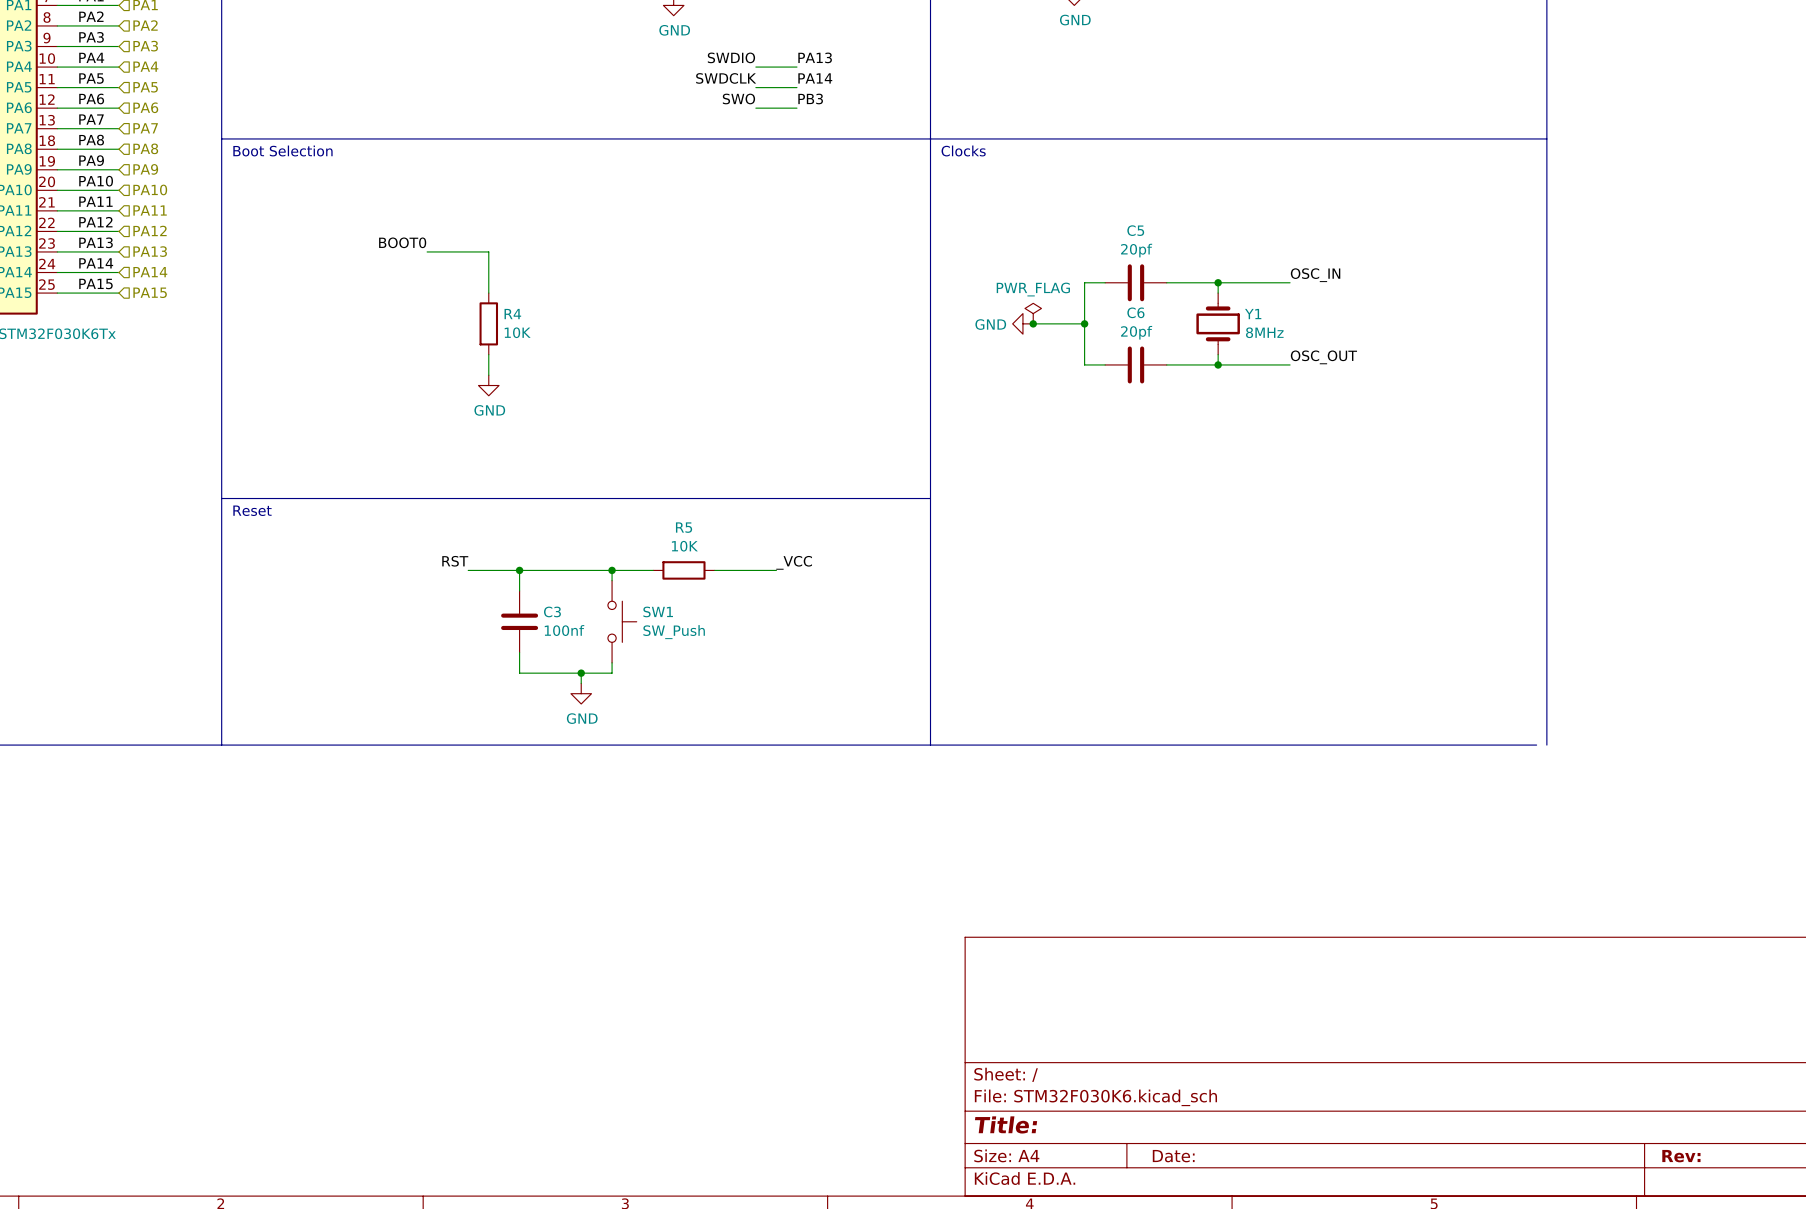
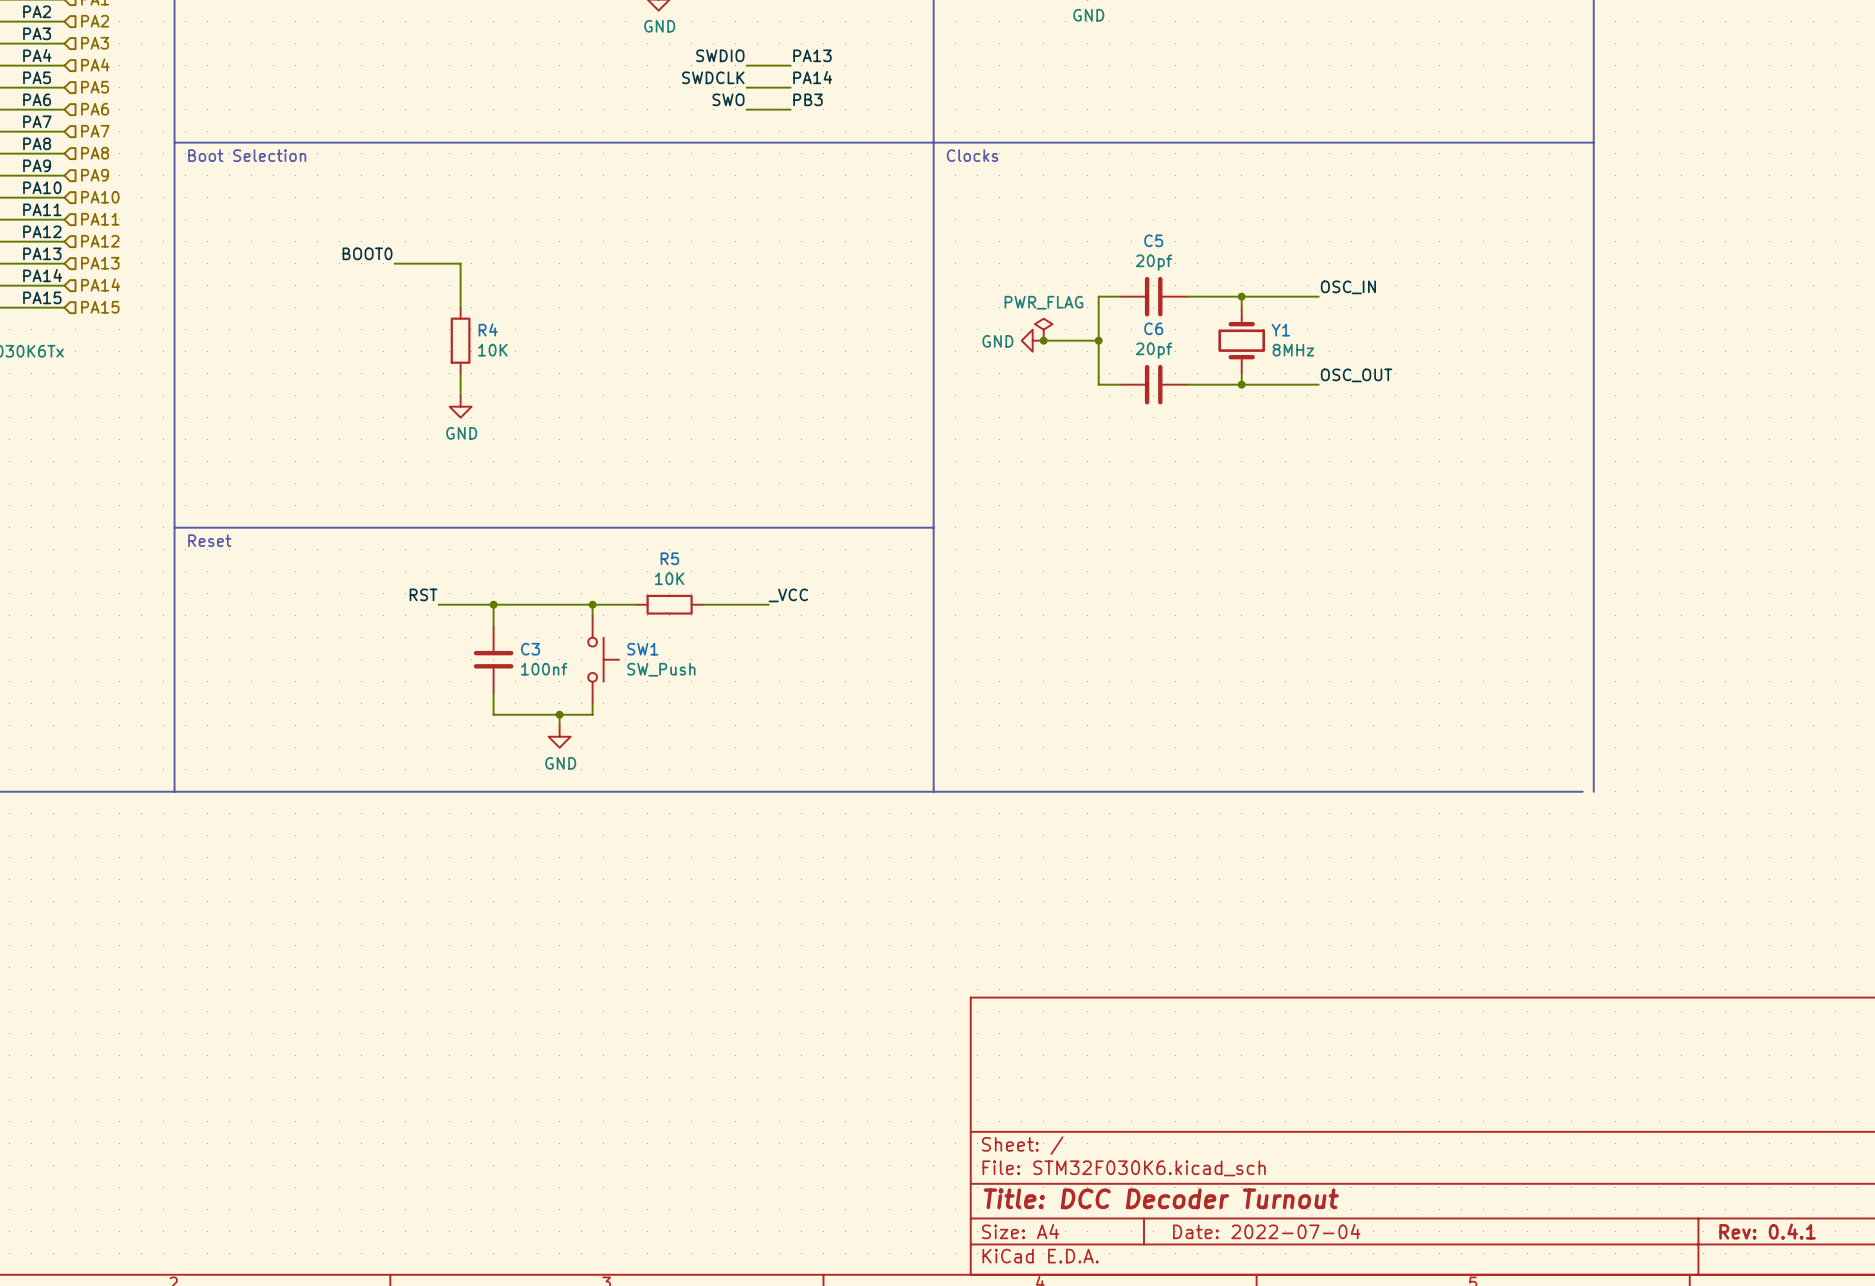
title block: Title: (1006, 1124) -> Title: DCC Decoder Turnout (1161, 1198)
title block: Date: (1173, 1156) -> Date: 2022-07-04 (1266, 1231)
title block: Rev: (1681, 1156) -> Rev: 0.4.1 (1767, 1231)

